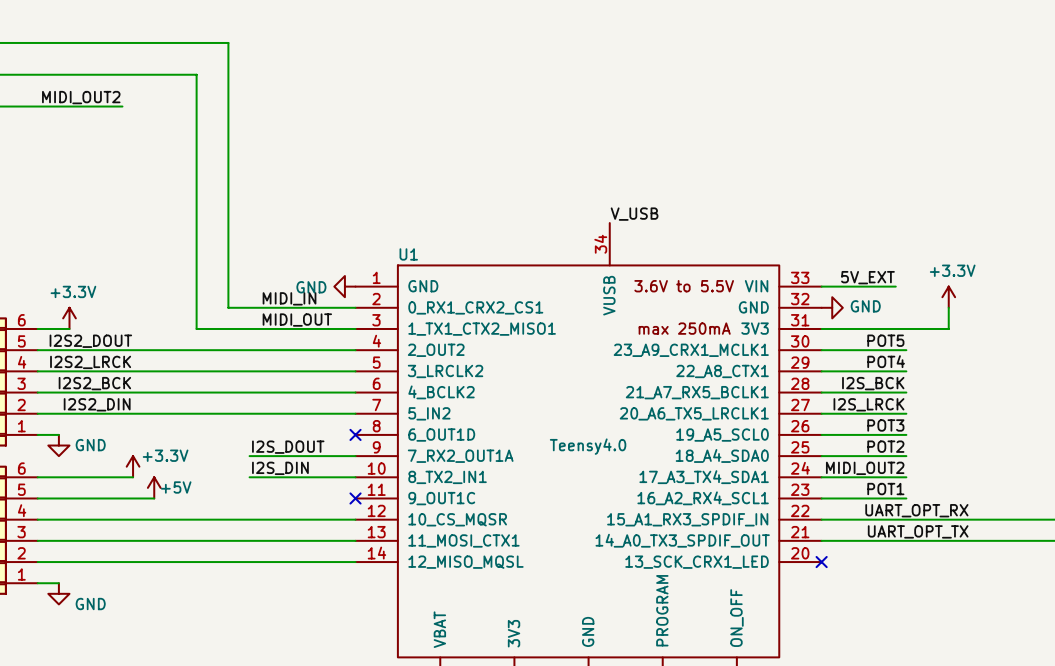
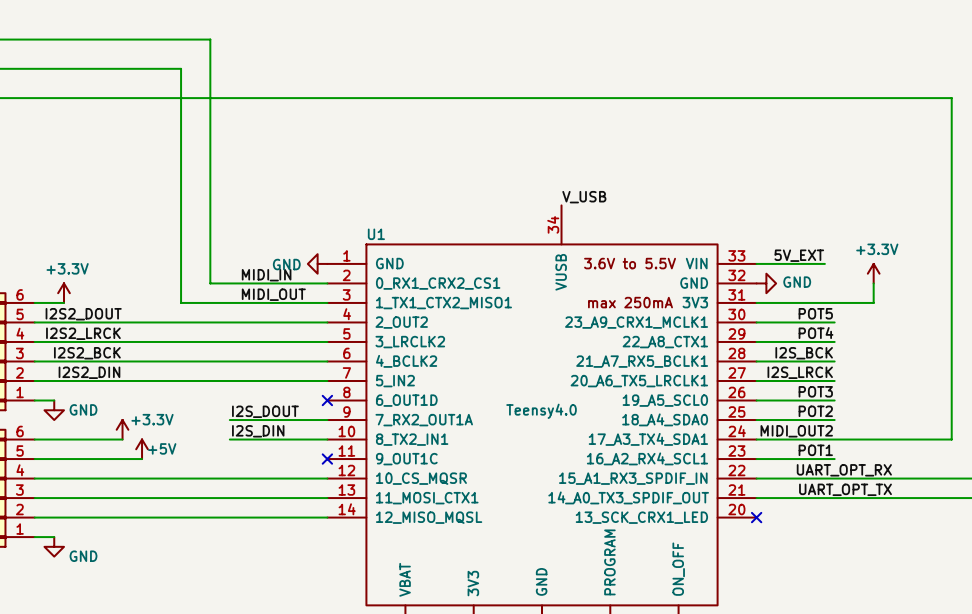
label: MIDI_OUT2 (81, 97) -> none
wire: none -> (112, 98) (951, 98) (951, 439) (834, 439)

